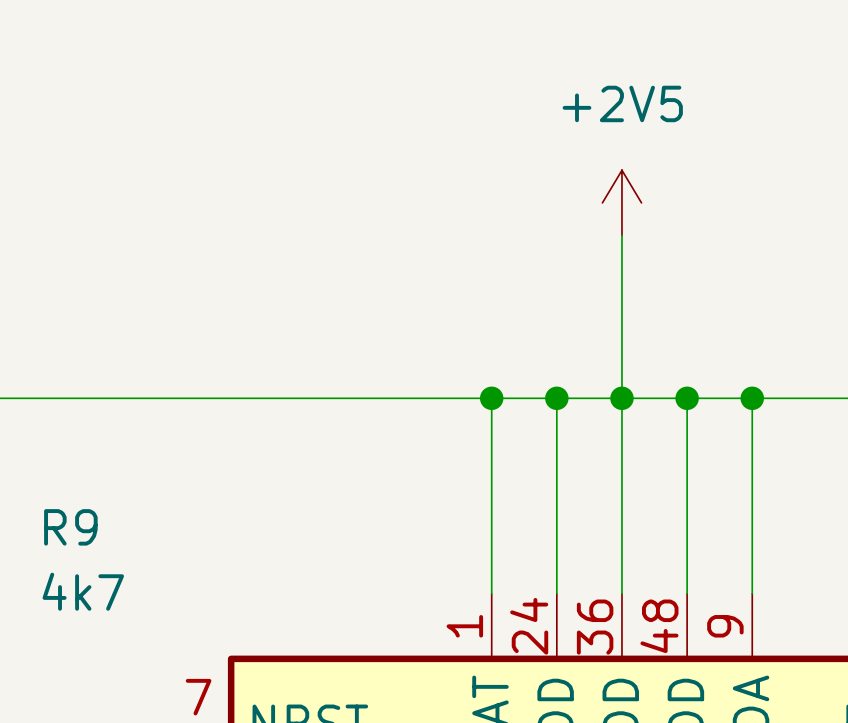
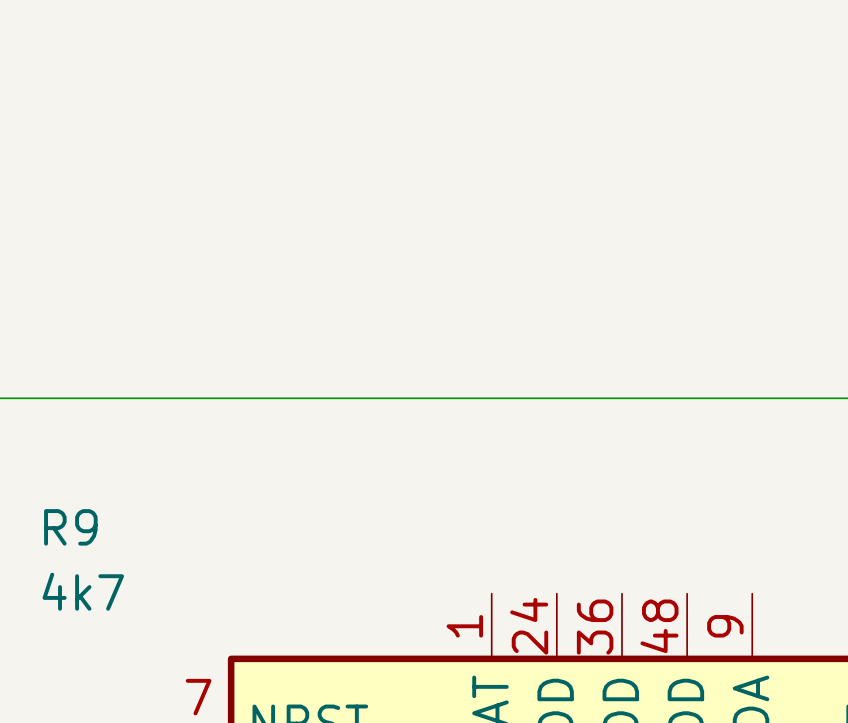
power symbol: +2V5 (621, 202) -> none
wire: (621, 235) (621, 593) -> none
wire: (491, 398) (491, 593) -> none
junction: (491, 398) -> none
wire: (556, 398) (556, 593) -> none
junction: (556, 398) -> none
junction: (621, 398) -> none
wire: (687, 398) (687, 593) -> none
junction: (687, 398) -> none
wire: (752, 398) (752, 593) -> none
junction: (752, 398) -> none

